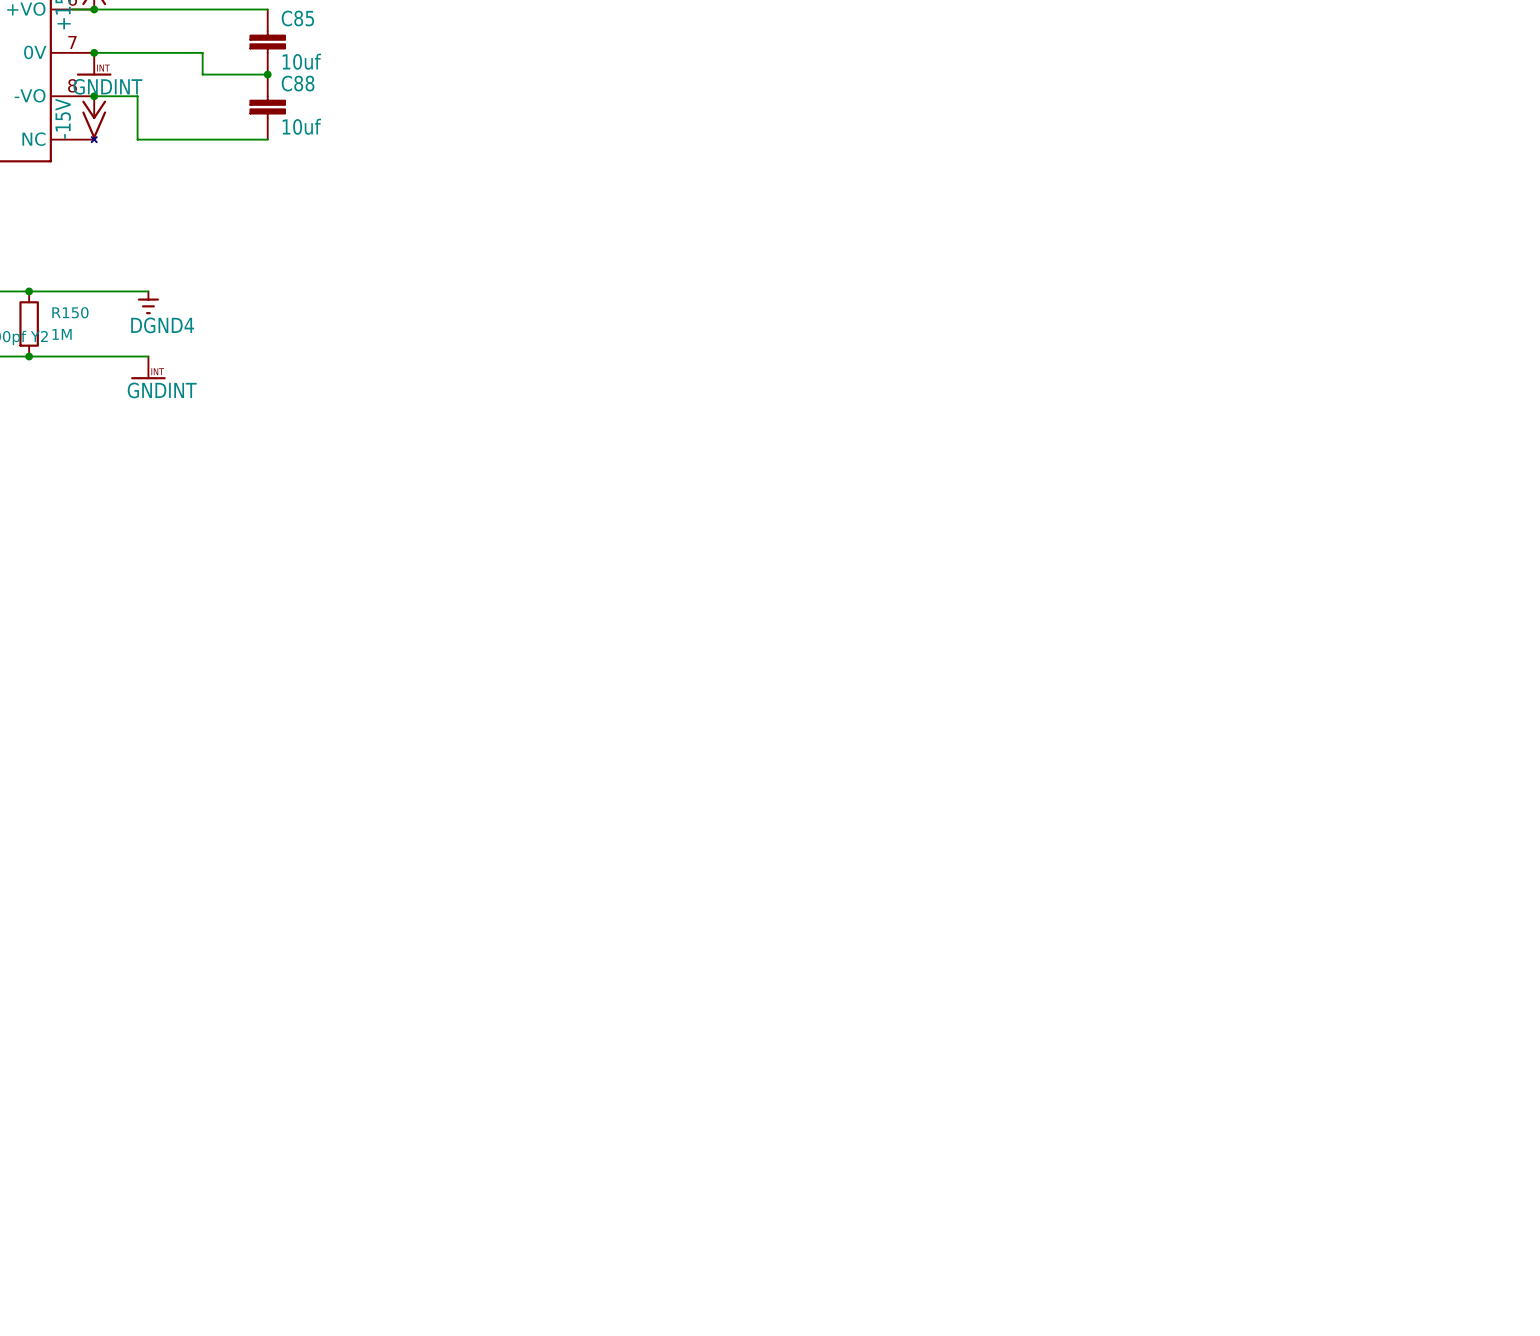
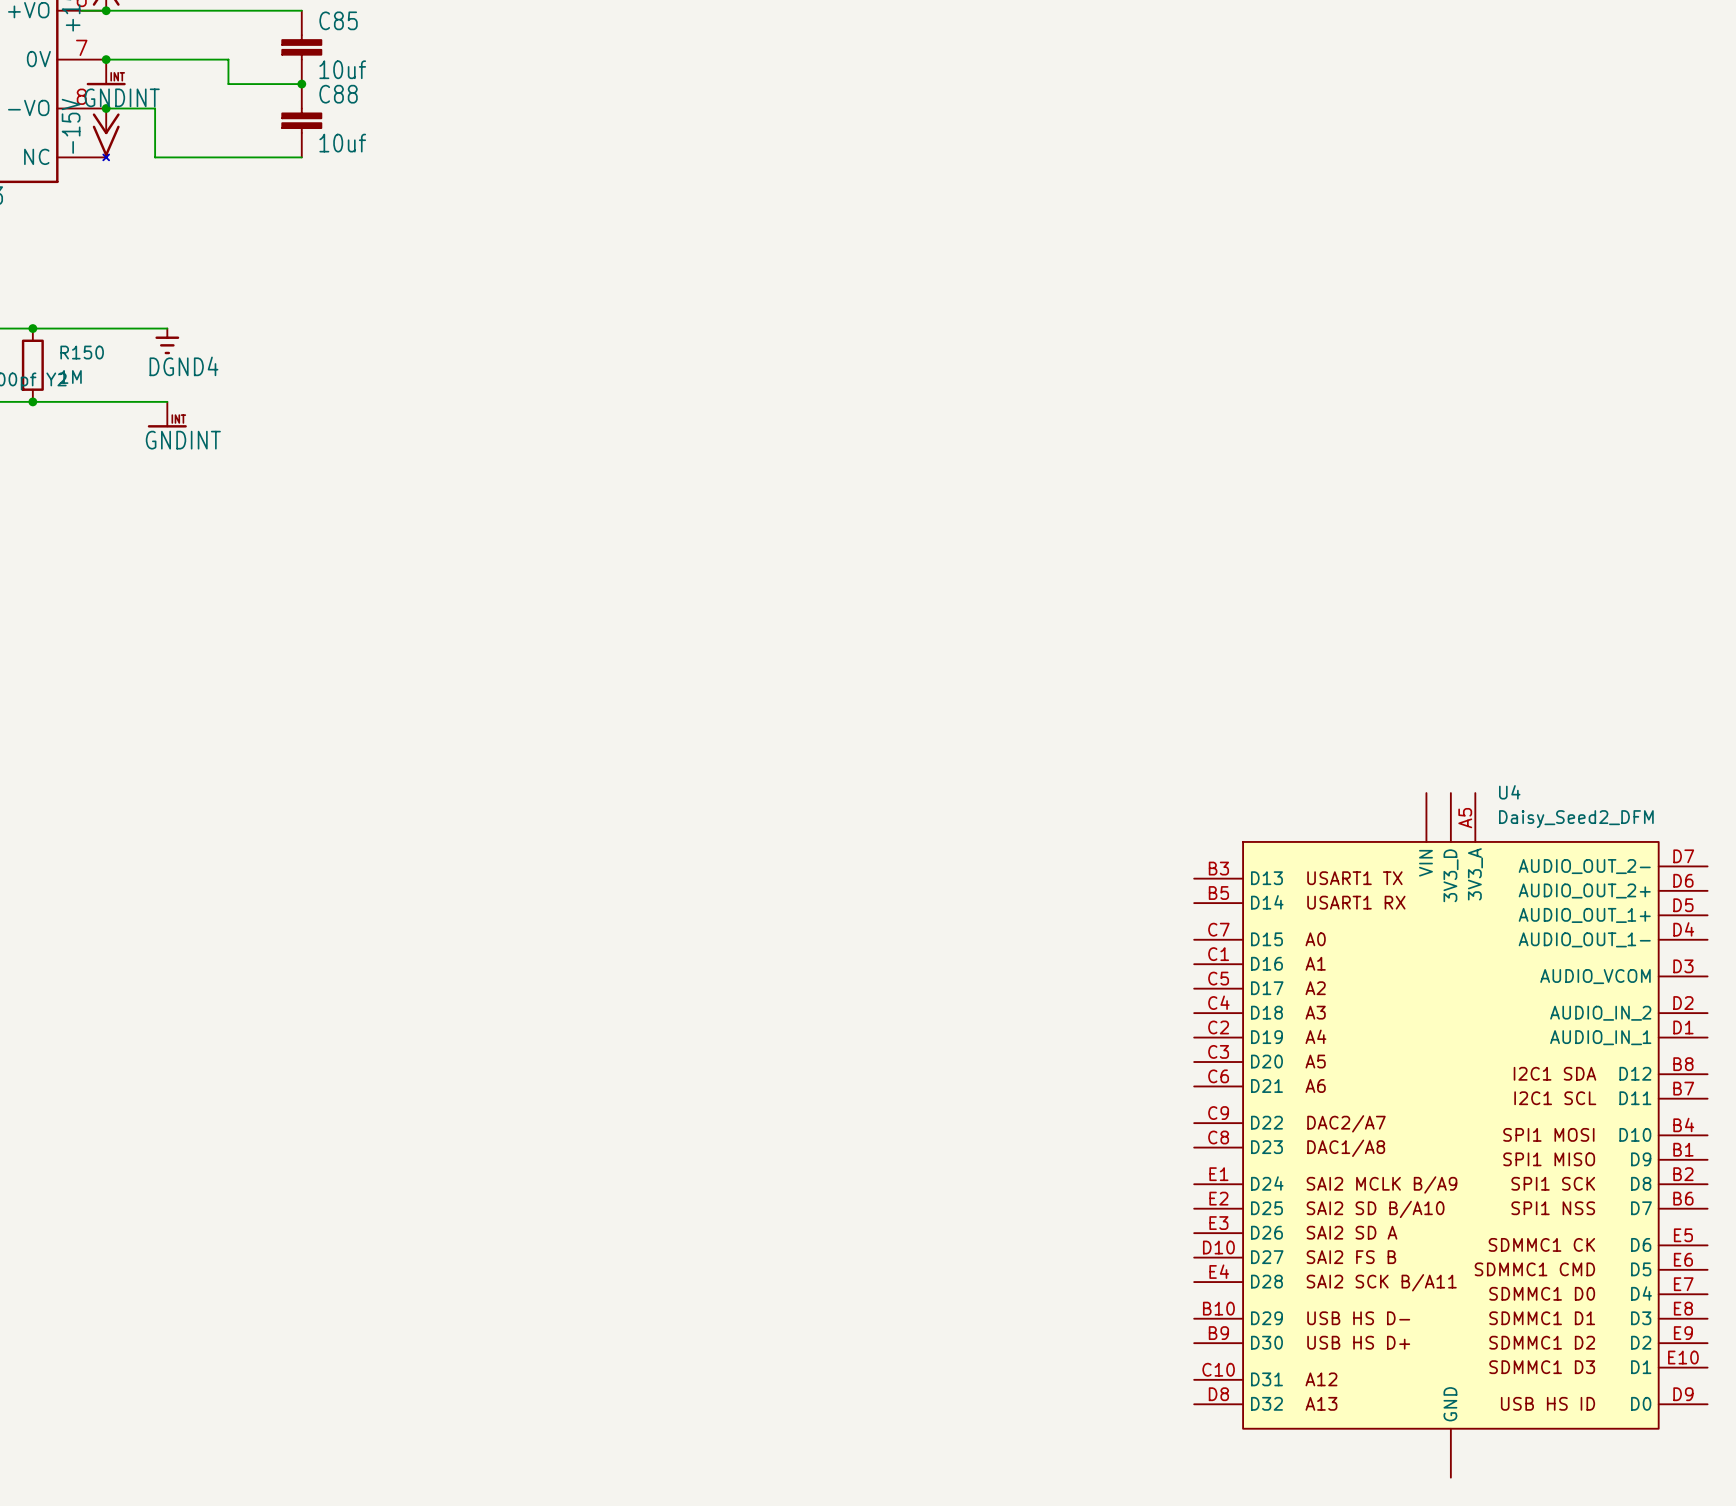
U4: none -> Daisy_Seed2_DFM (1450, 1135)

